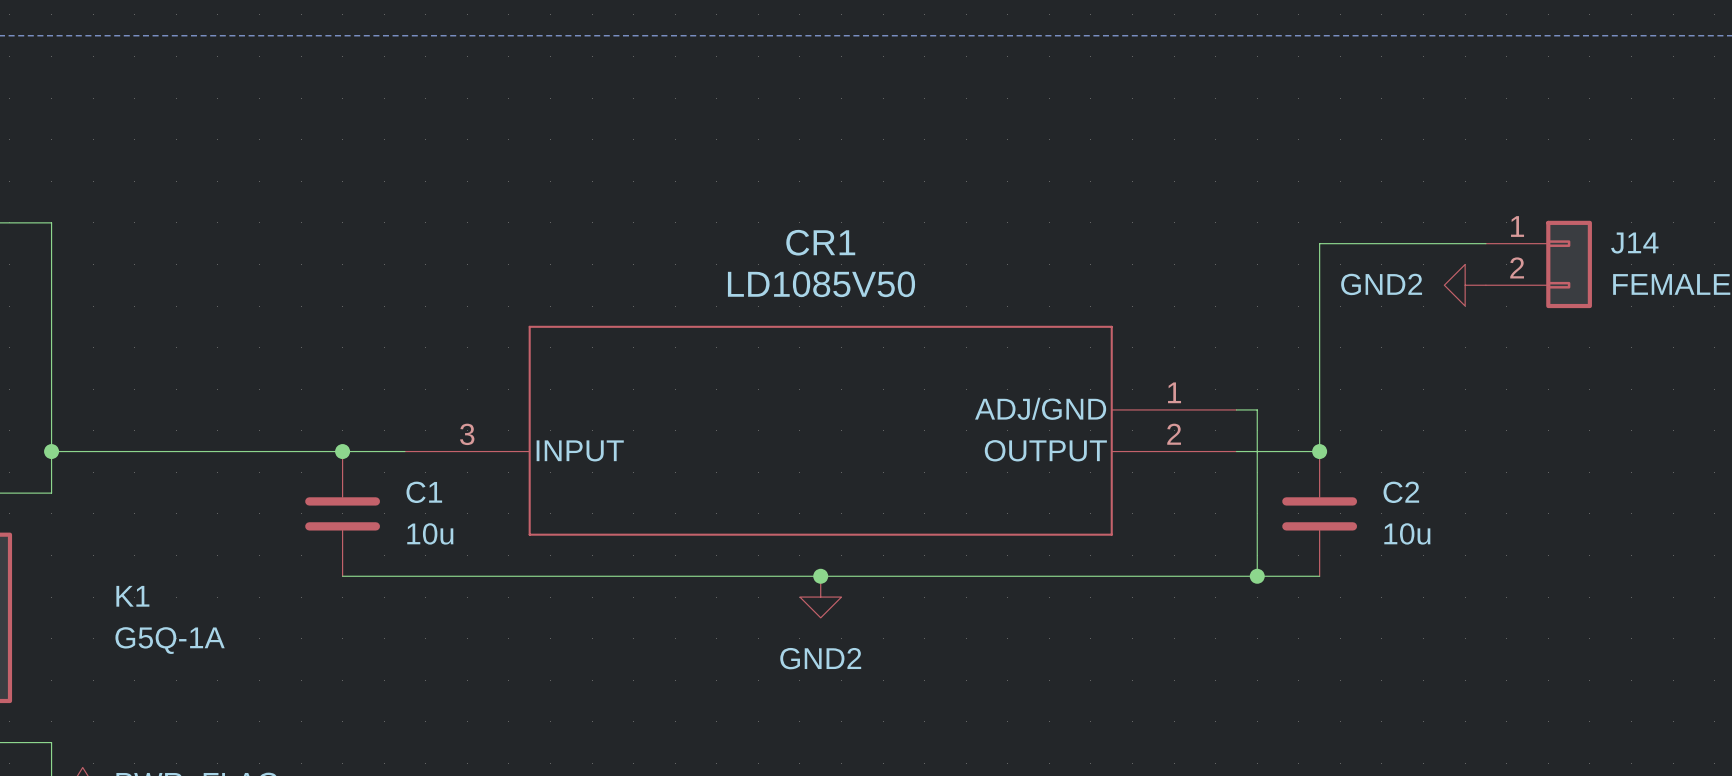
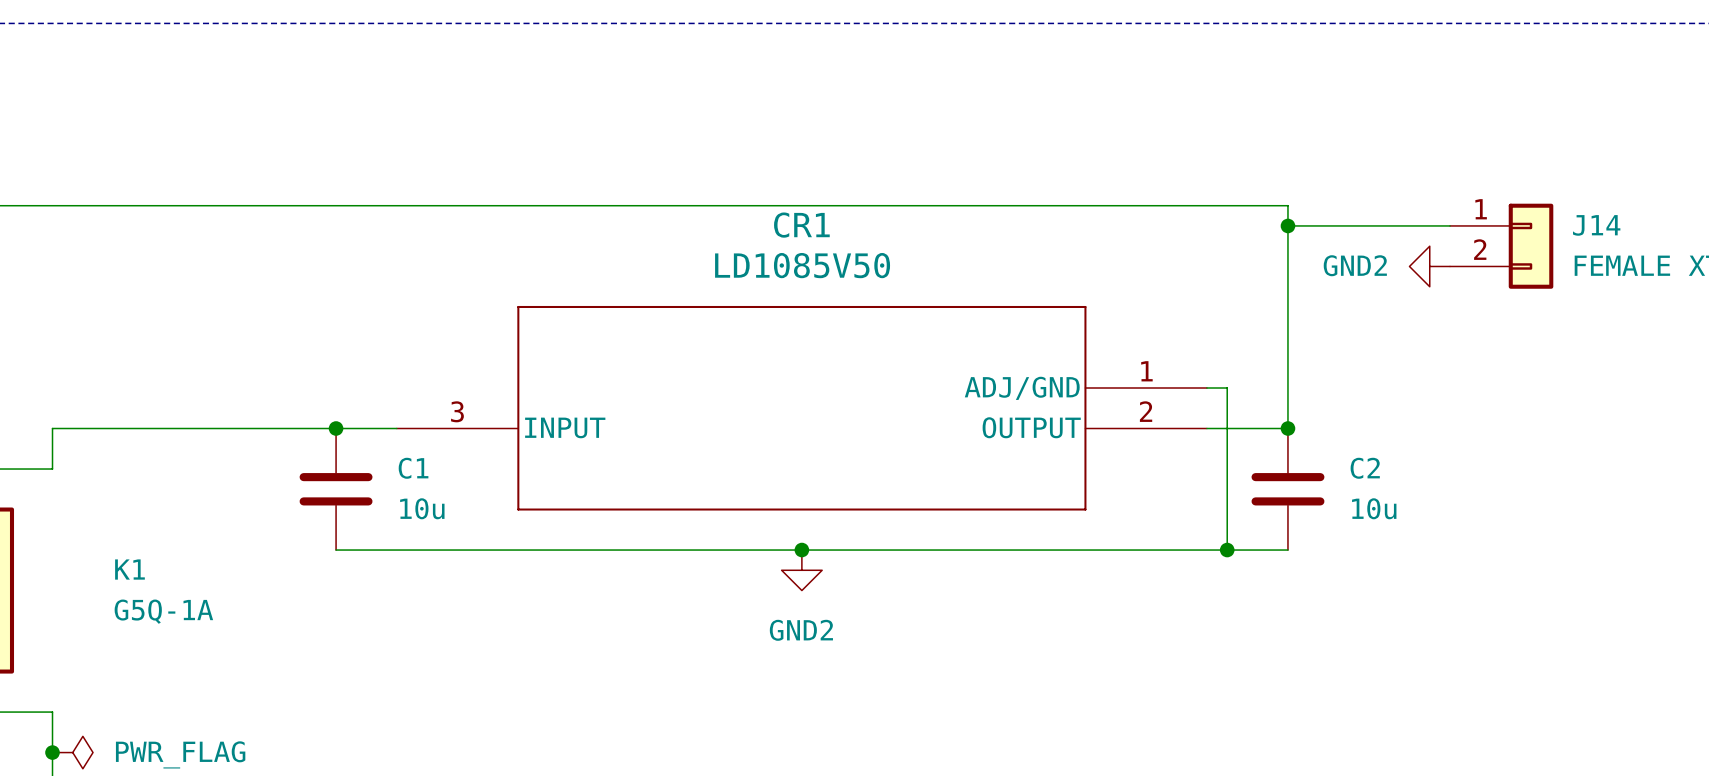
wire: (51, 222) (51, 451) -> (52, 205) (1287, 205) (1287, 225)
junction: none -> (1287, 225)
junction: (51, 451) -> none

